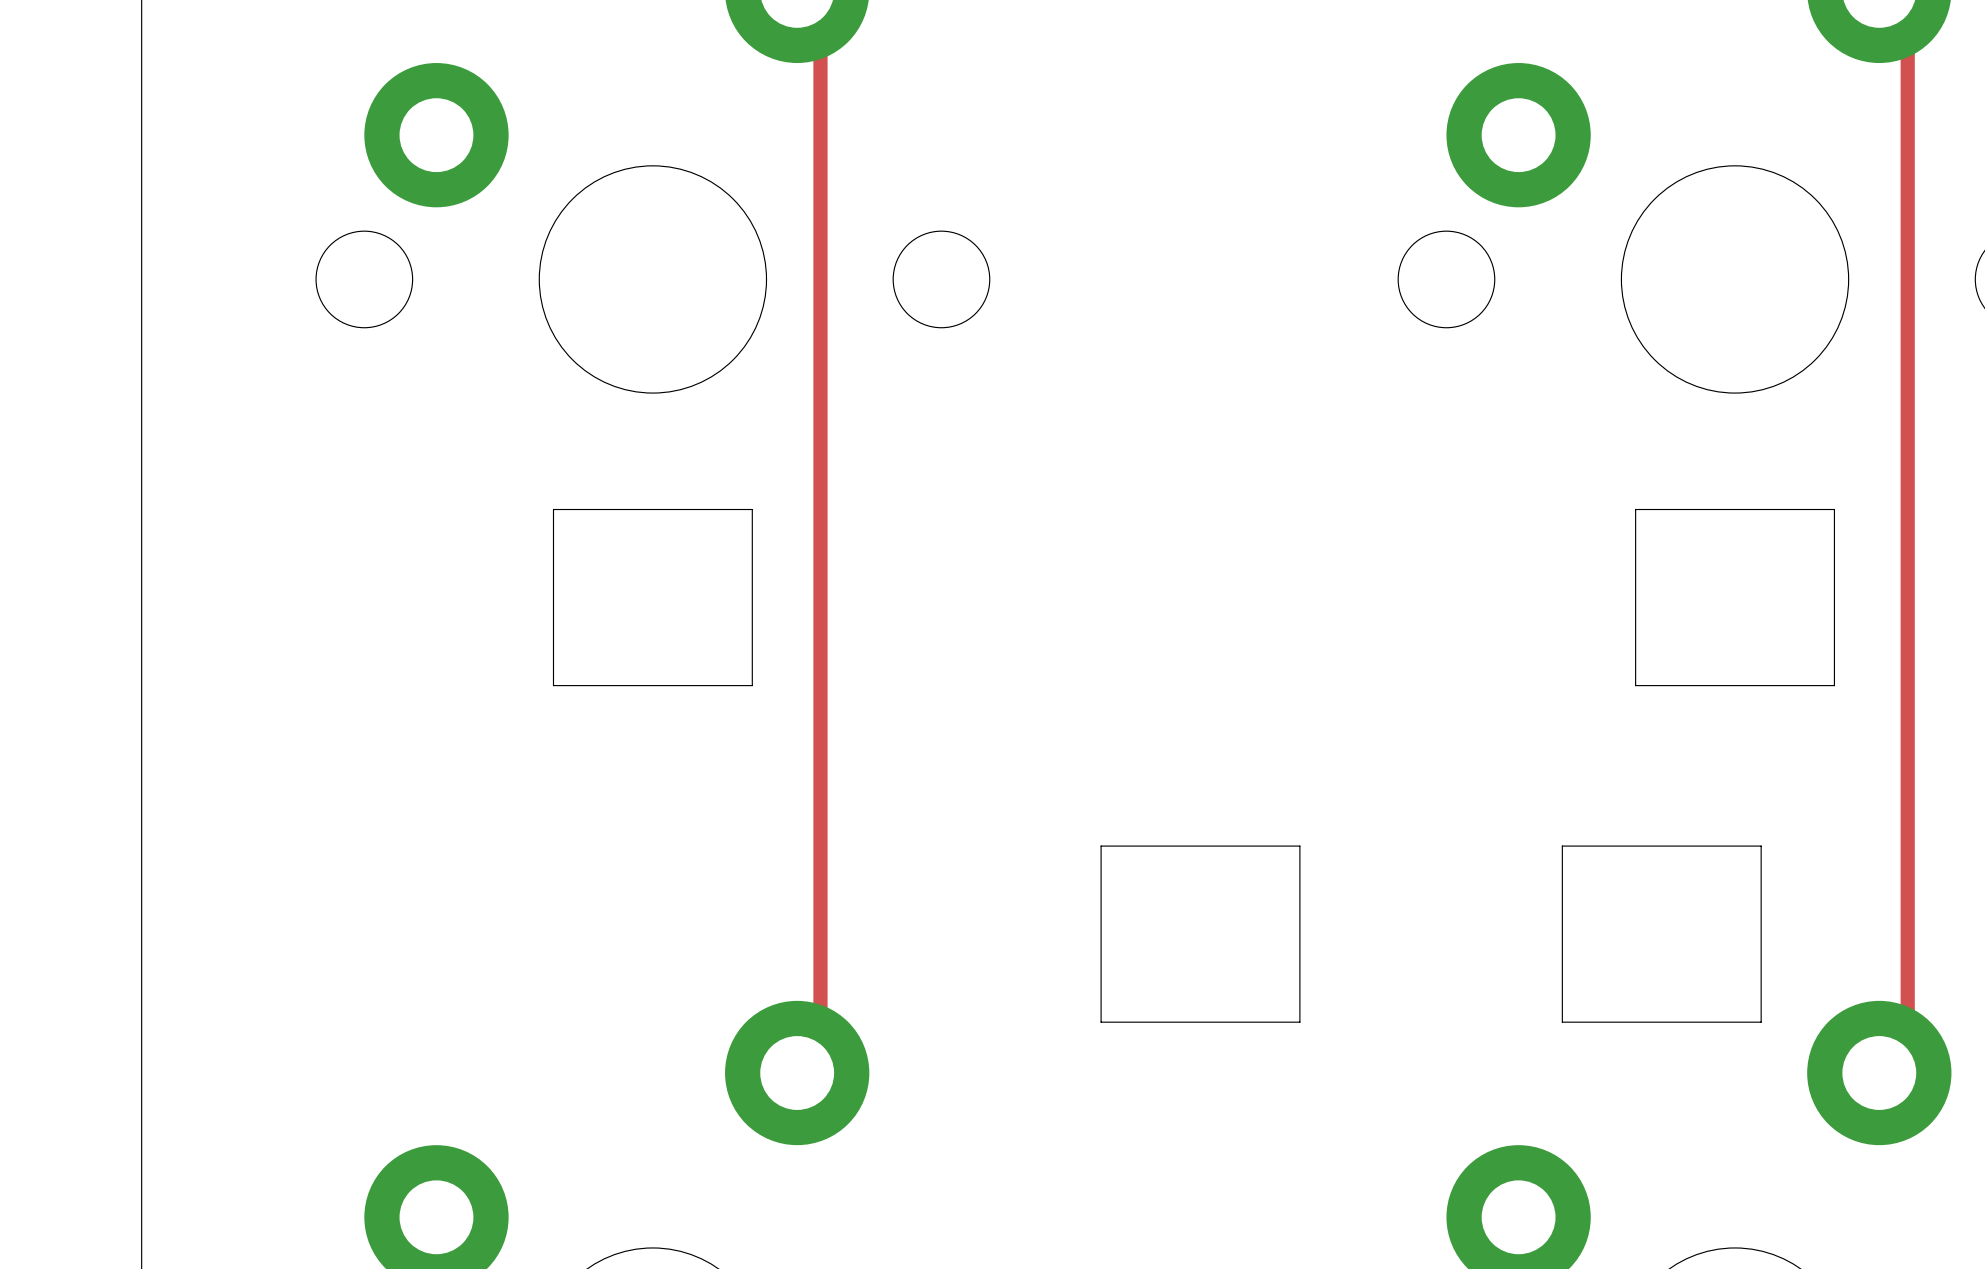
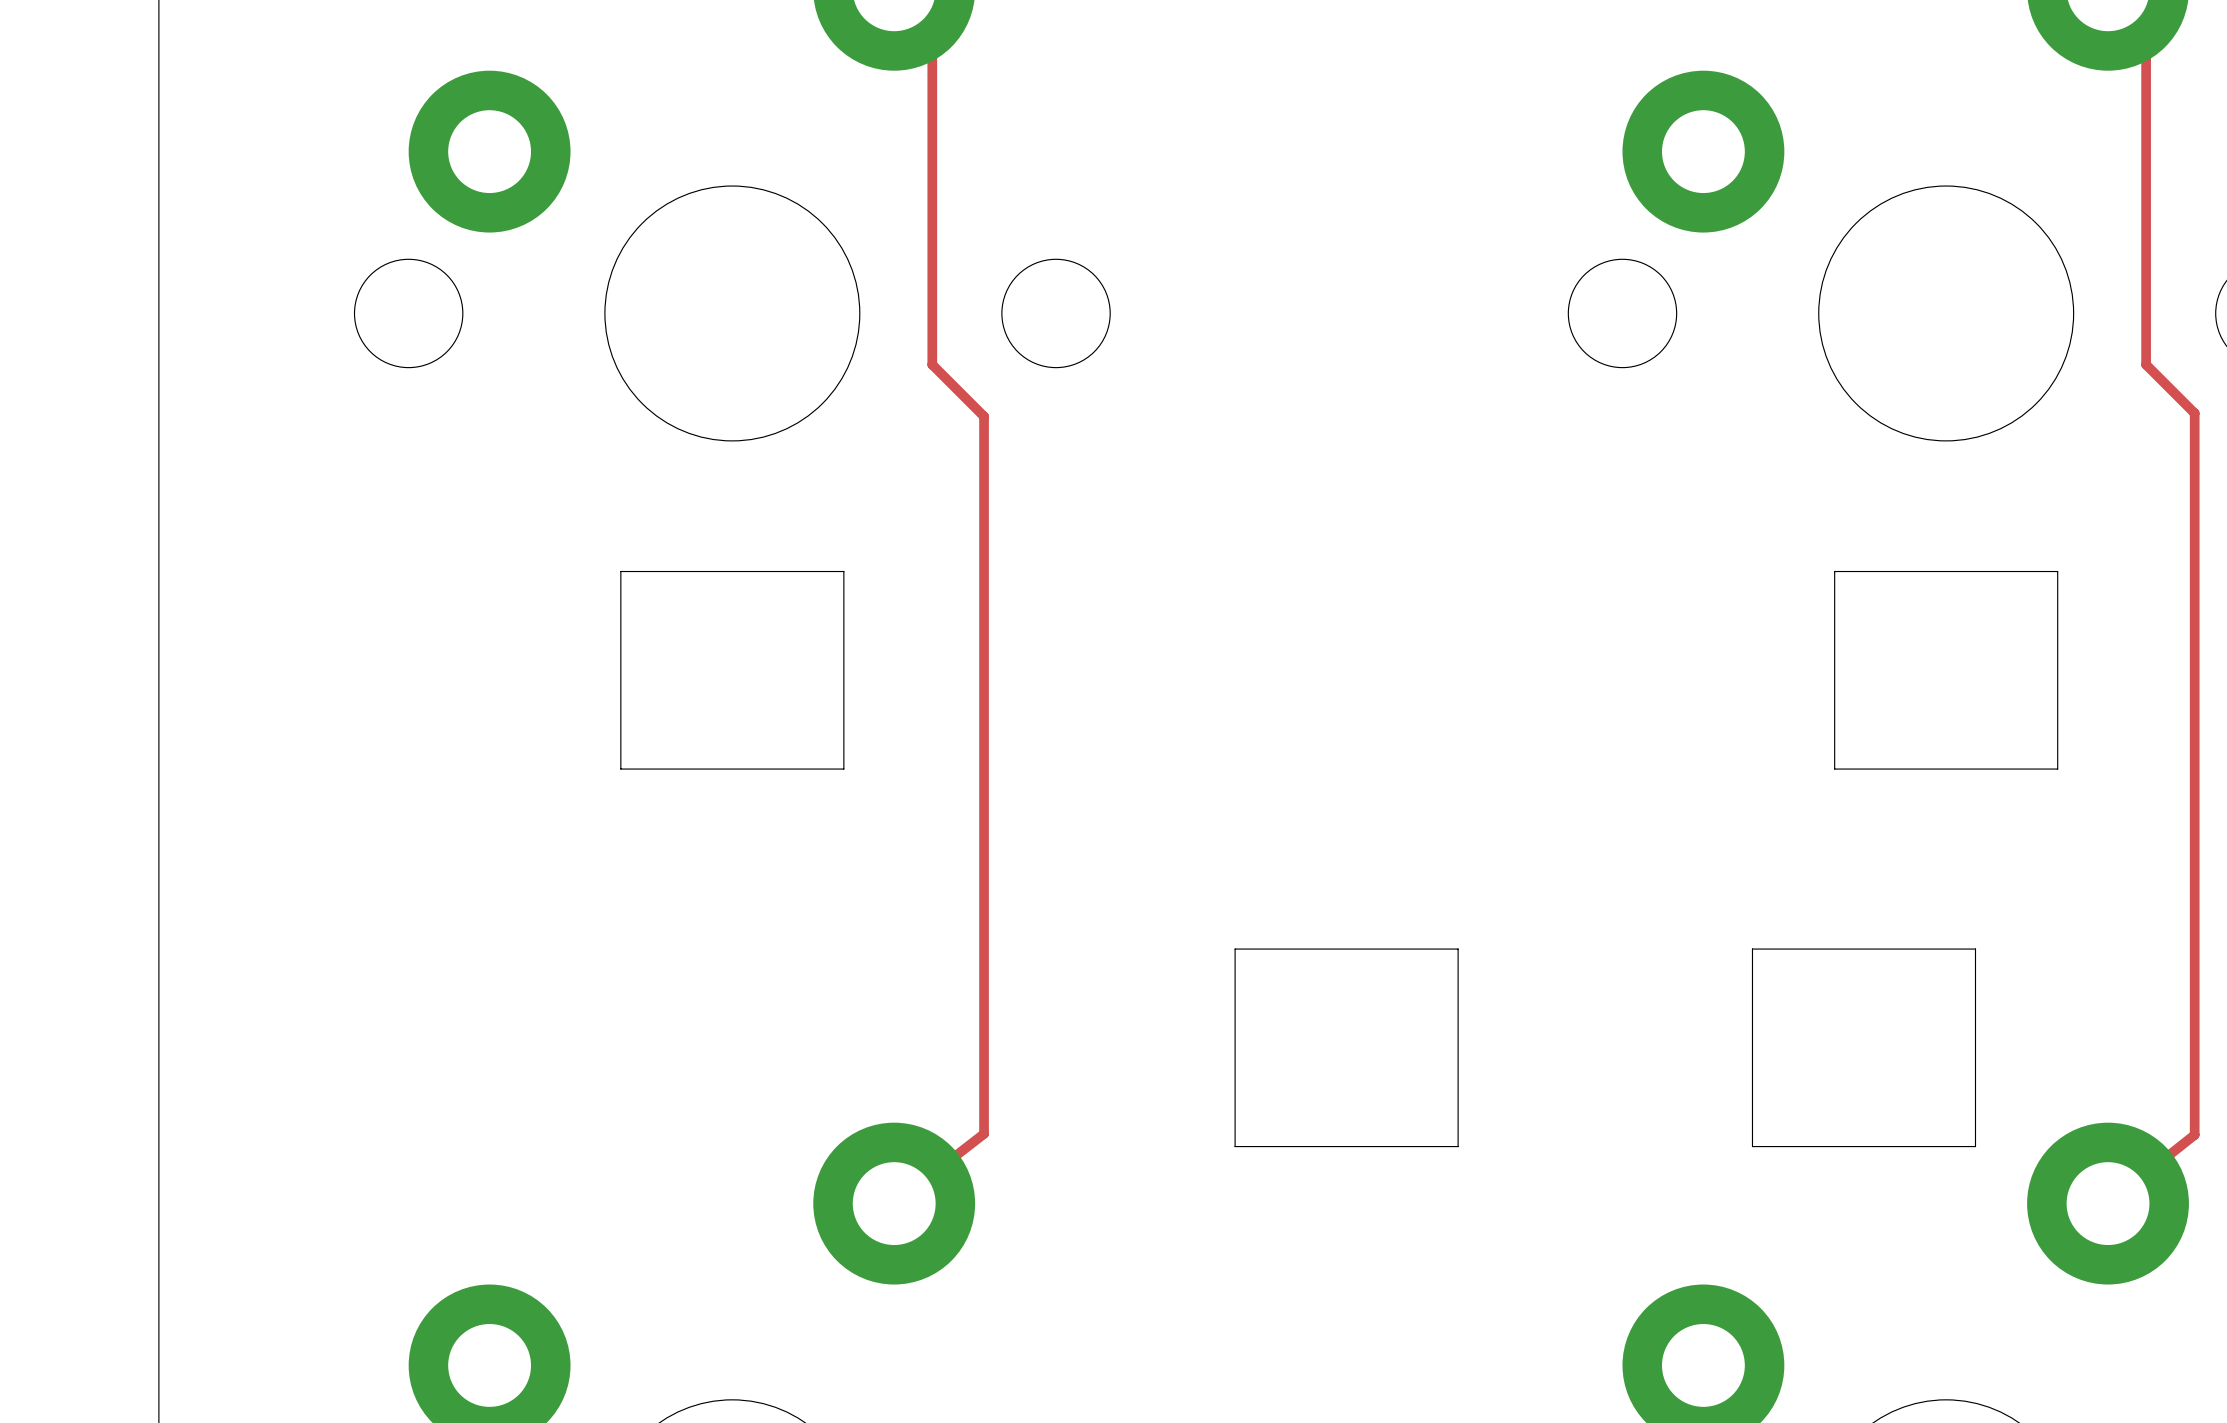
track: (820, 14) (820, 1049) (797, 1073) -> (920, 15) (932, 27) (932, 364) (984, 416) (984, 1133) (894, 1203)
track: (1907, 19) (1907, 1044) (1879, 1073) -> (2139, 21) (2146, 27) (2146, 364) (2194, 413) (2194, 1134) (2108, 1203)

